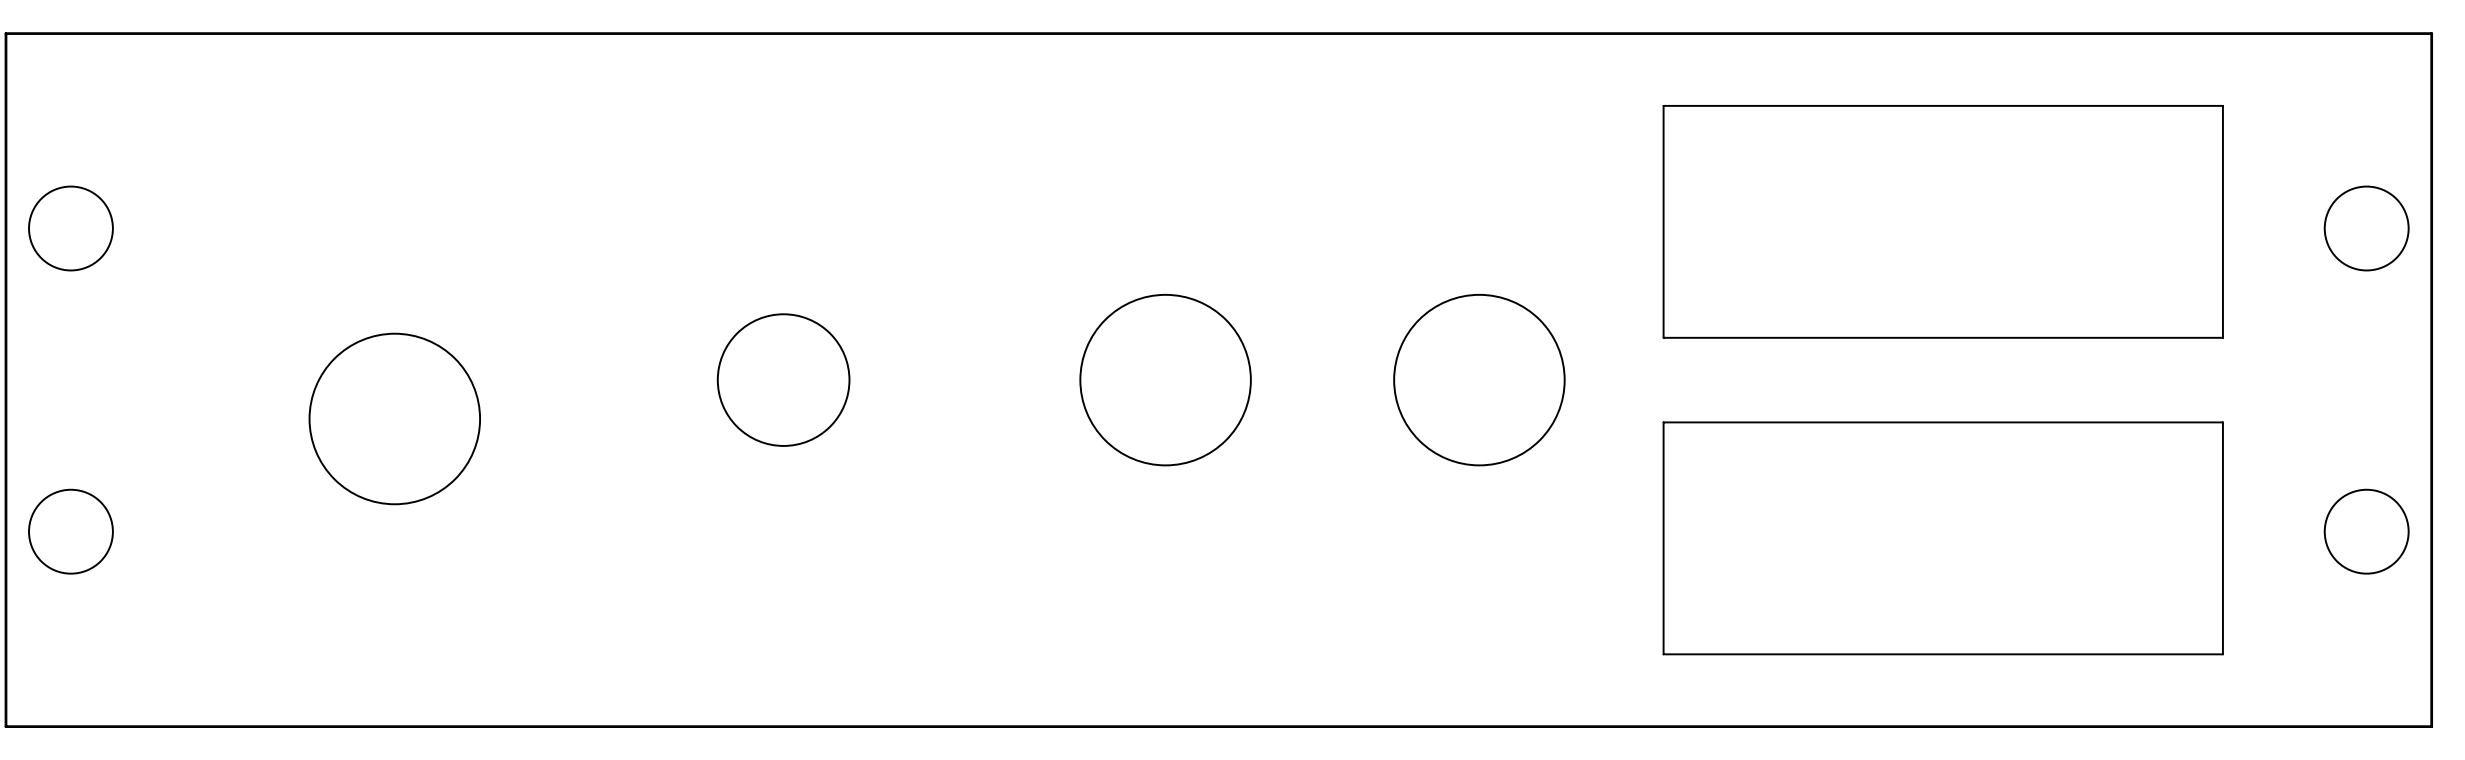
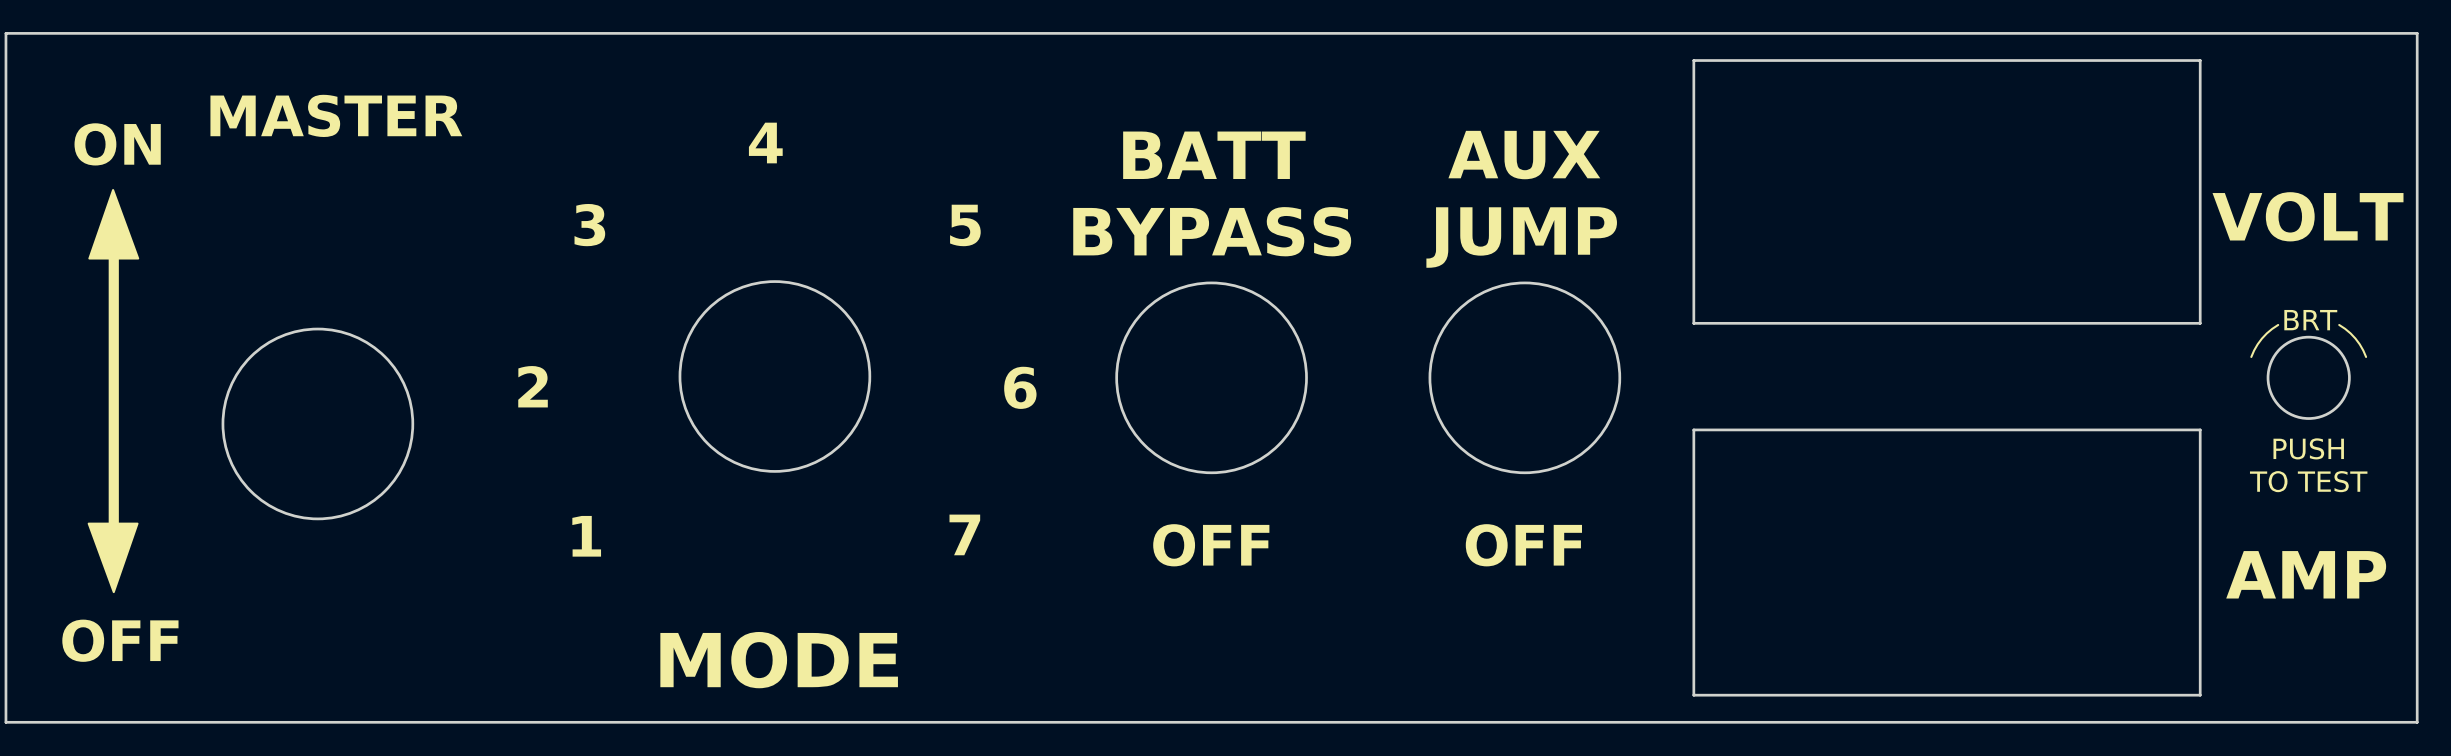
board edge: (1663, 105) (1663, 337) (2222, 337) (2222, 105) (1663, 105) -> (1693, 60) (1693, 323) (2200, 323) (2200, 60) (1693, 60)
text: none -> MASTER (336, 115)
text: none -> 4 (765, 143)
text: none -> ON (117, 144)
text: none -> AUX (1524, 155)
text: none -> BATT (1214, 155)
round board edge: [28, 185, 114, 272] -> none
round board edge: [2324, 185, 2410, 272] -> none
drawing: none -> [88, 189, 140, 260]
text: none -> VOLT (2308, 216)
text: none -> 3 (589, 225)
text: none -> 5 (965, 225)
text: none -> JUMP (1521, 237)
text: none -> BYPASS (1212, 231)
line: none -> (113, 249) (113, 530)
round board edge: none -> [1115, 281, 1308, 475]
round board edge: none -> [1428, 281, 1622, 475]
round board edge: [1079, 294, 1252, 467] -> none
round board edge: [1393, 294, 1566, 467] -> none
round board edge size: [717, 313, 851, 447] -> [678, 280, 872, 473]
text: none -> BRT (2310, 320)
line: none -> (2278, 324) (2261, 338) (2251, 356)
line: none -> (2339, 324) (2355, 338) (2366, 356)
round board edge: none -> [221, 327, 415, 521]
round board edge: [308, 333, 481, 505] -> none
round board edge: none -> [2266, 335, 2351, 420]
text: none -> 2 (533, 386)
text: none -> 6 (1020, 387)
board edge: (1663, 422) (2222, 422) (2222, 654) (1663, 654) (1663, 422) -> (1693, 429) (1693, 695) (2200, 695) (2200, 429) (1693, 429)
text: none -> PUSH (2308, 448)
text: none -> TO TEST (2308, 481)
round board edge: [28, 489, 114, 575] -> none
round board edge: [2324, 489, 2410, 575] -> none
drawing: none -> [87, 522, 139, 594]
text: none -> 7 (964, 534)
text: none -> 1 (586, 536)
text: none -> OFF (1211, 545)
text: none -> OFF (1523, 545)
text: none -> AMP (2306, 574)
text: none -> OFF (120, 640)
text: none -> MODE (779, 660)

